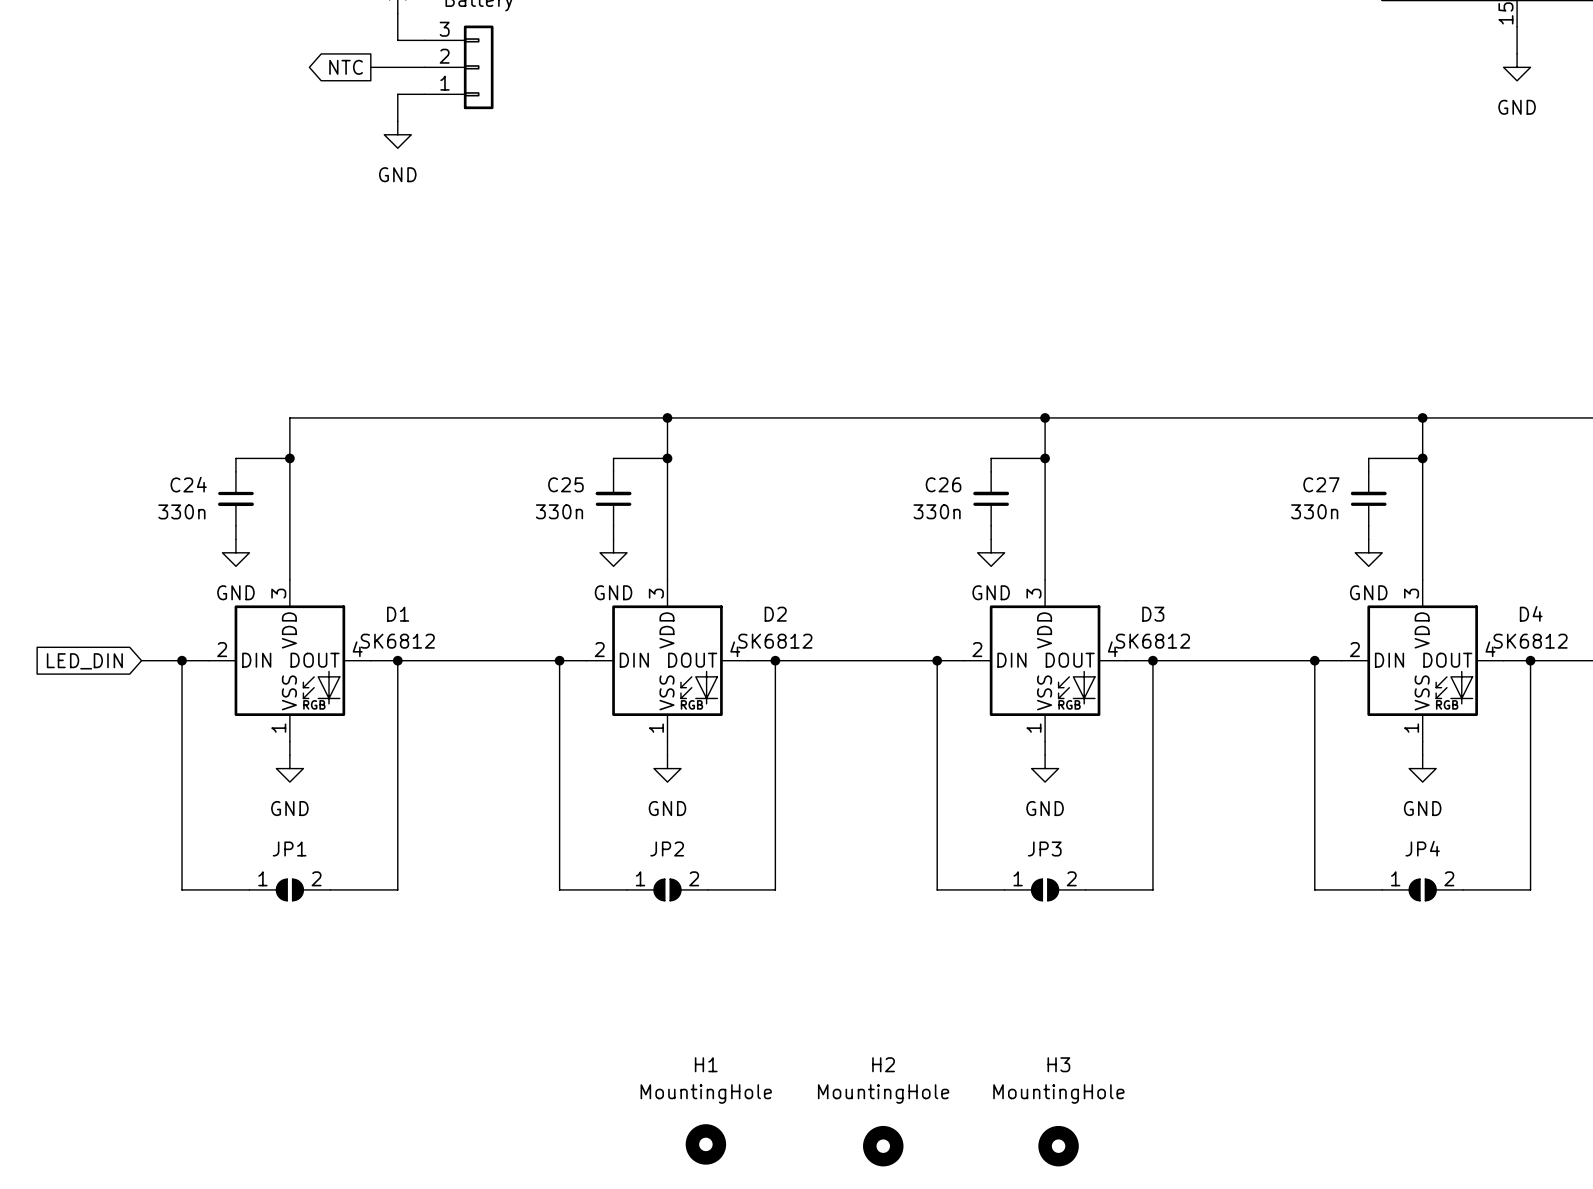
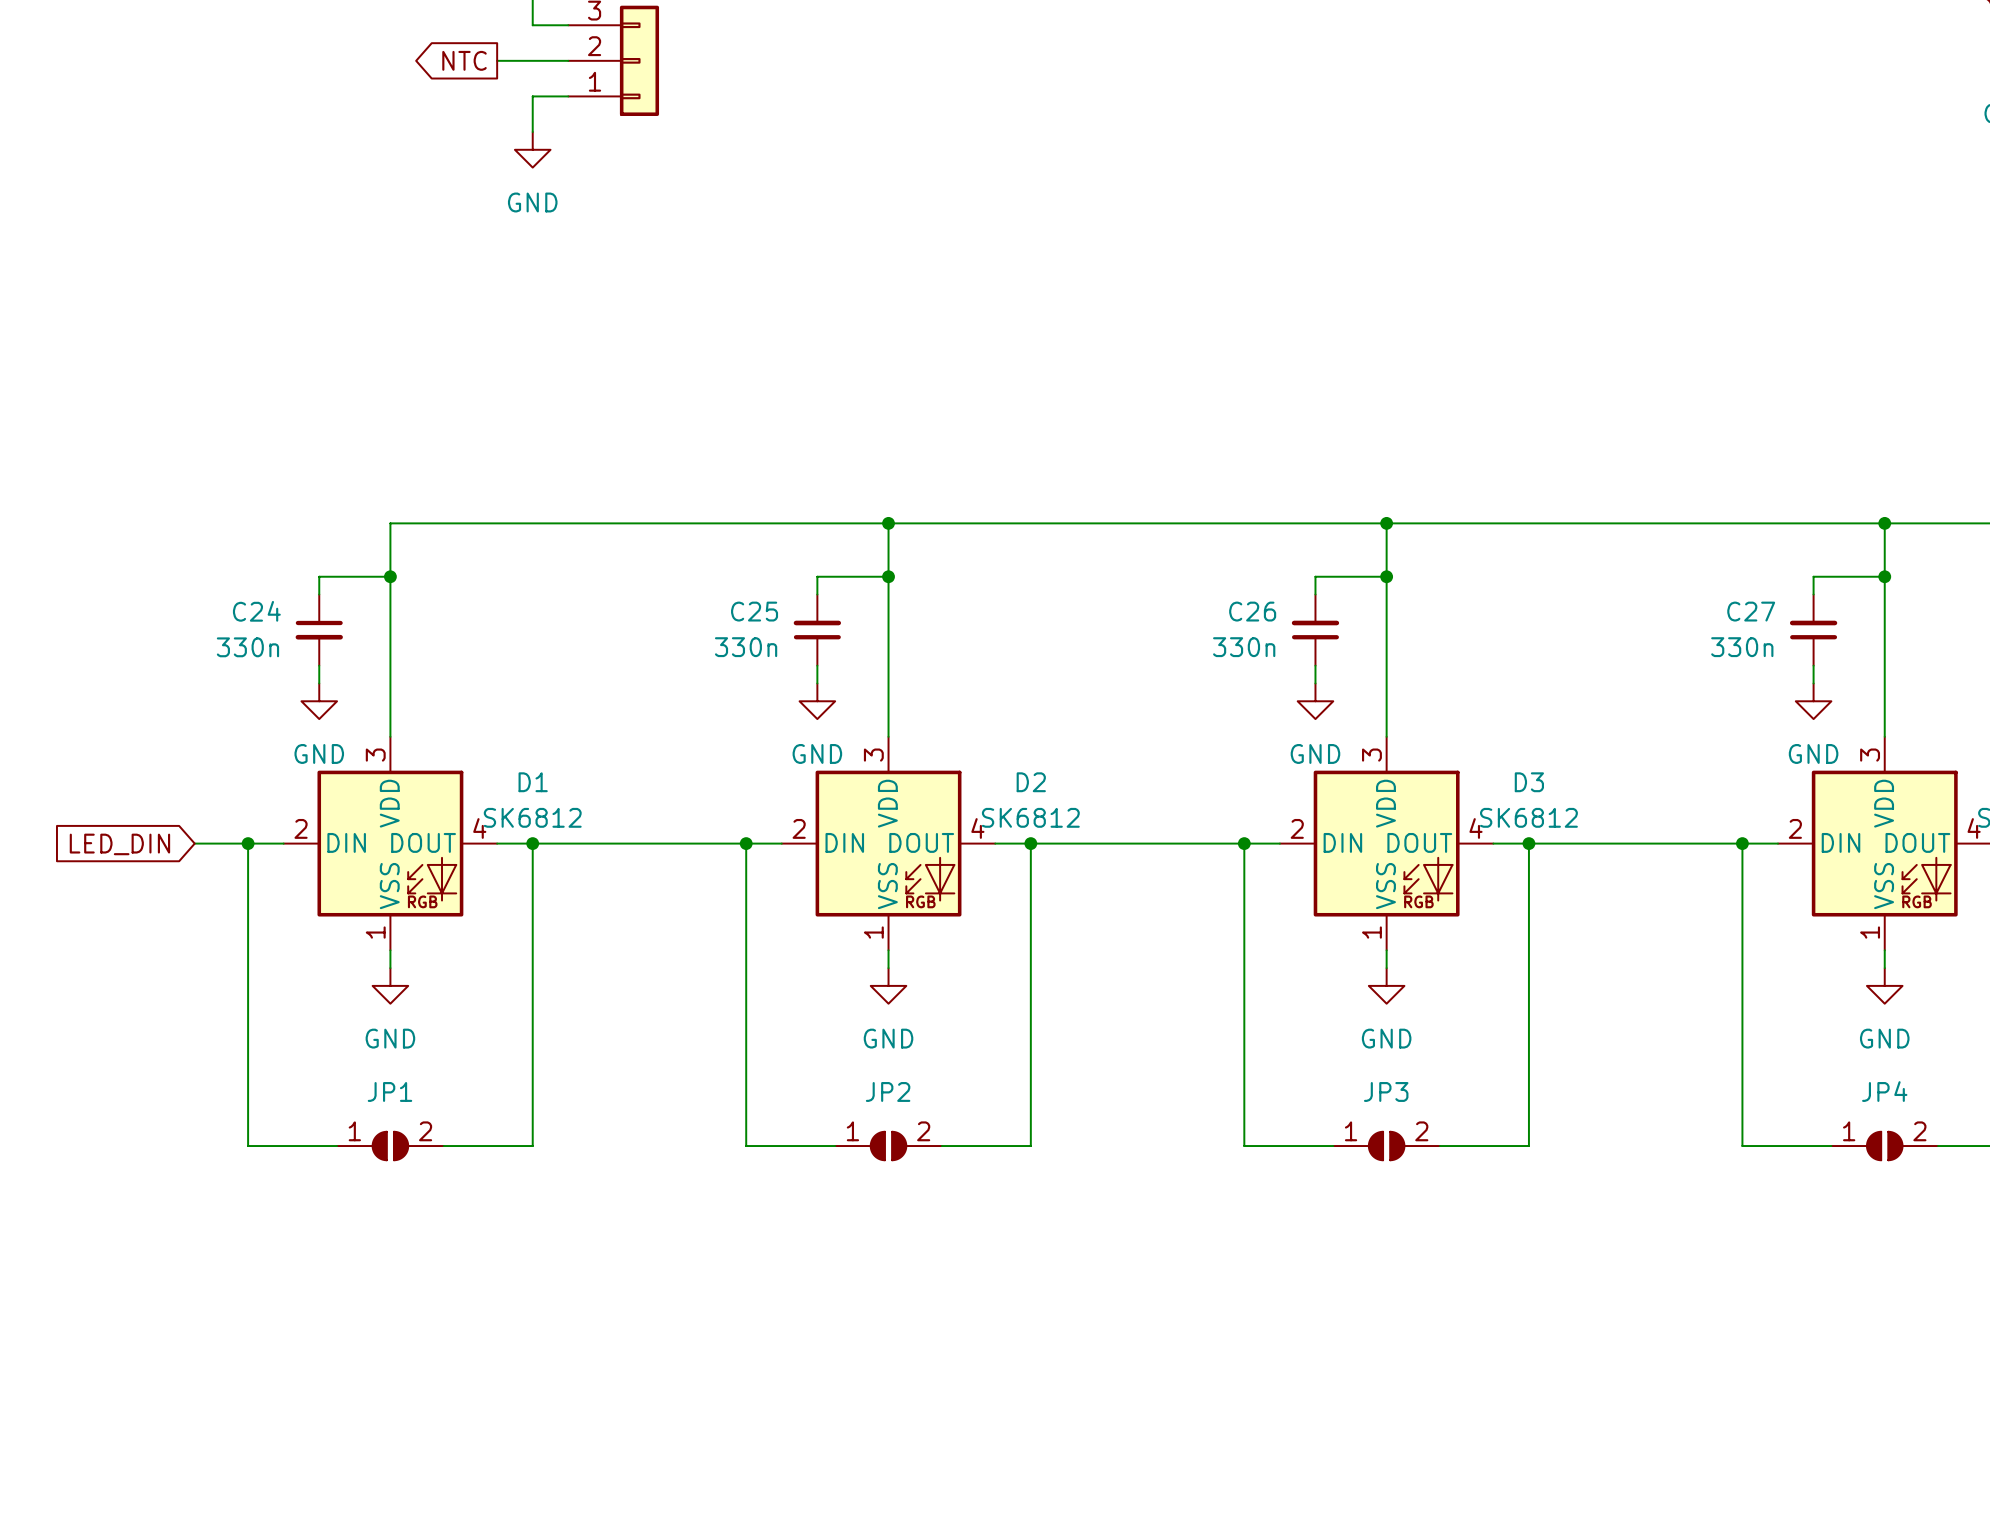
H1: MountingHole (705, 1144) -> none
H2: MountingHole (883, 1146) -> none
H3: MountingHole (1058, 1146) -> none

